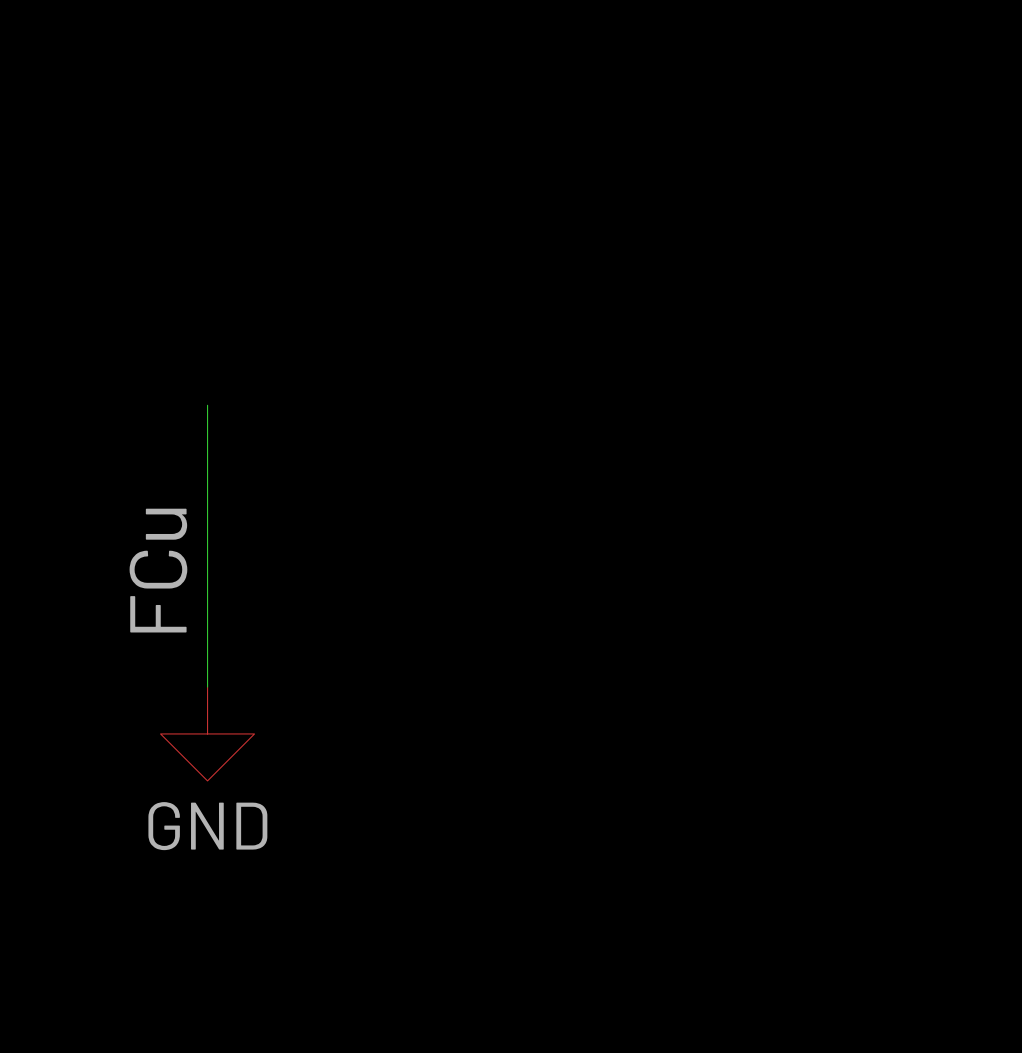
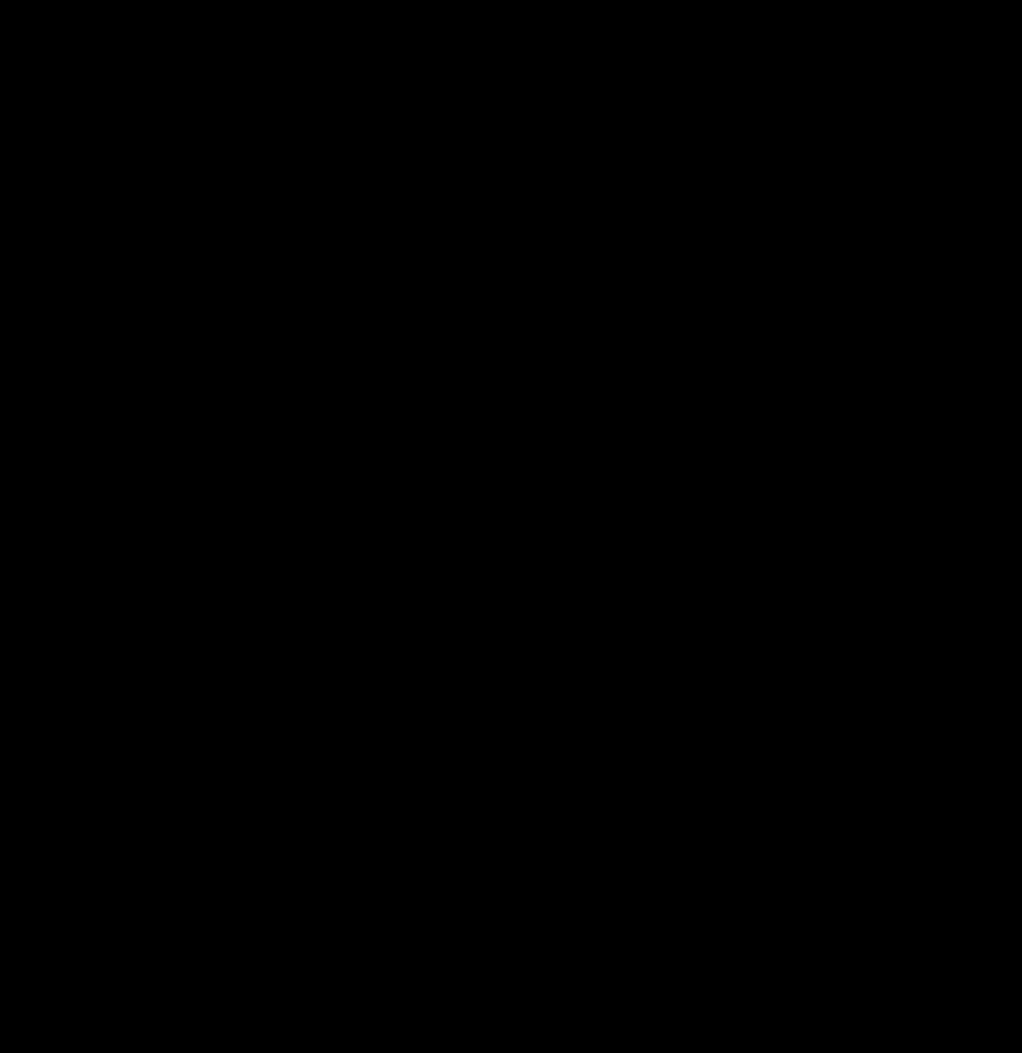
wire: (207, 405) (207, 687) -> none
label: FCu (158, 570) -> none
power symbol: GND (207, 733) -> none

